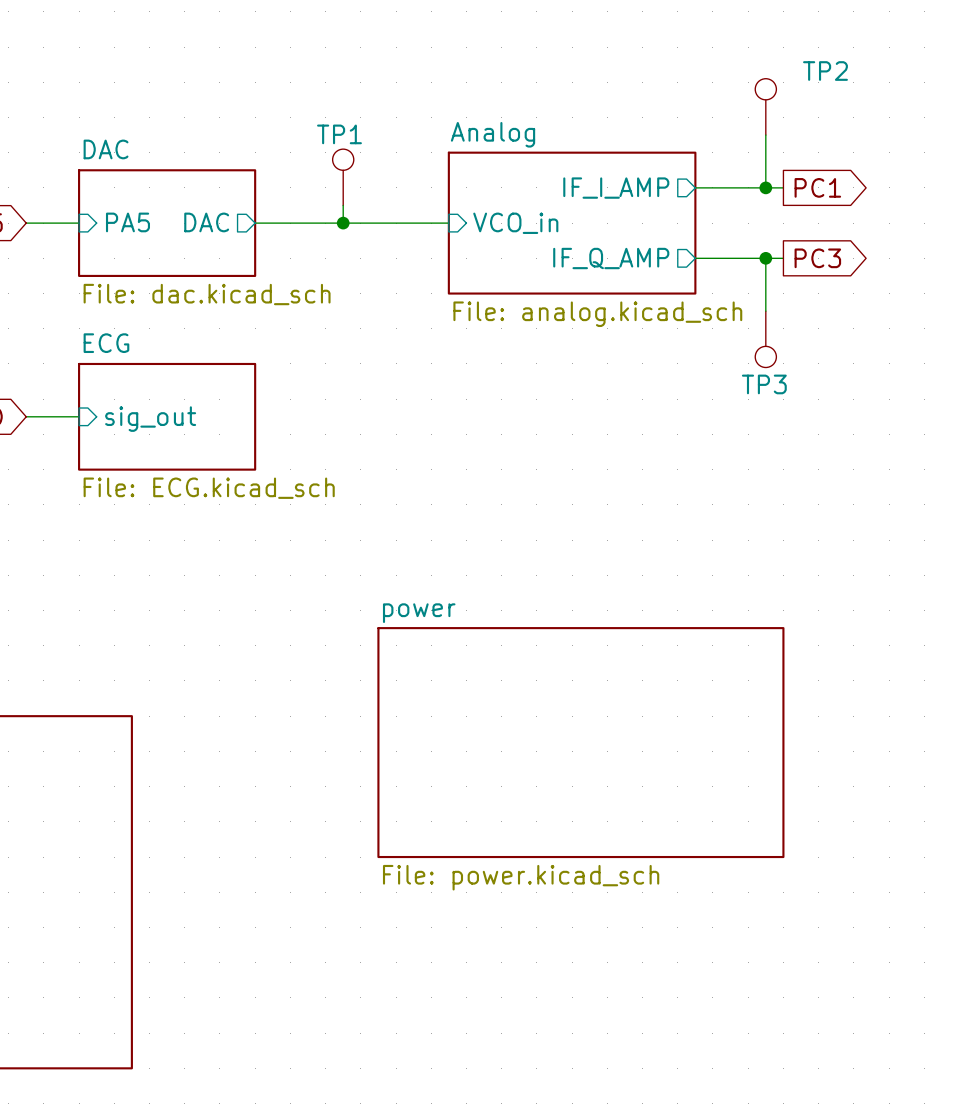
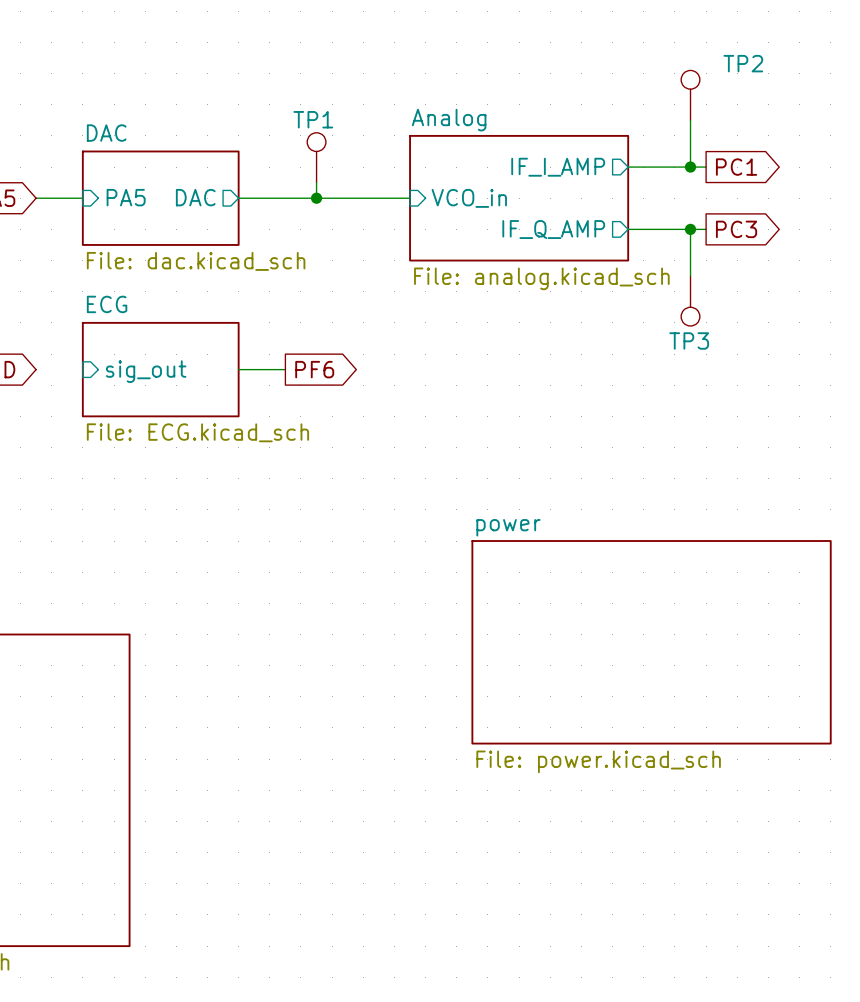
wire: (26, 416) (79, 416) -> (238, 369) (285, 369)
global label: none -> PF6 (314, 369)
sheet power position: (580, 742) -> (651, 642)

